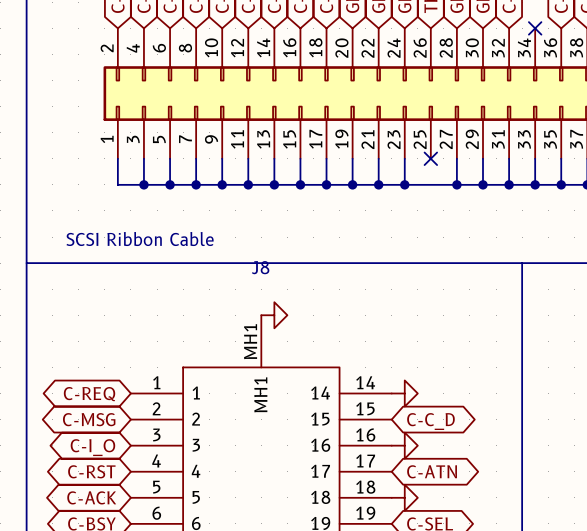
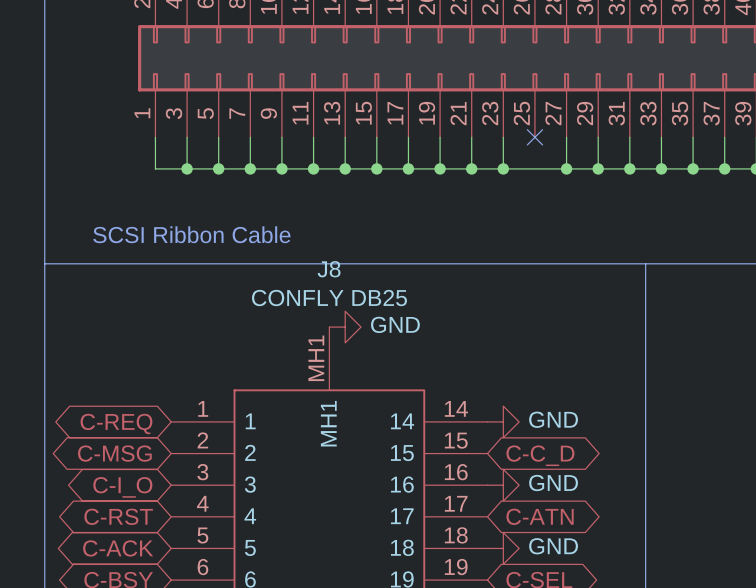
J8 value: none -> CONFLY DB25 (329, 298)
power symbol text: none -> GND (395, 324)
power symbol text: none -> GND (553, 419)
power symbol text: none -> GND (553, 483)
power symbol text: none -> GND (553, 546)

